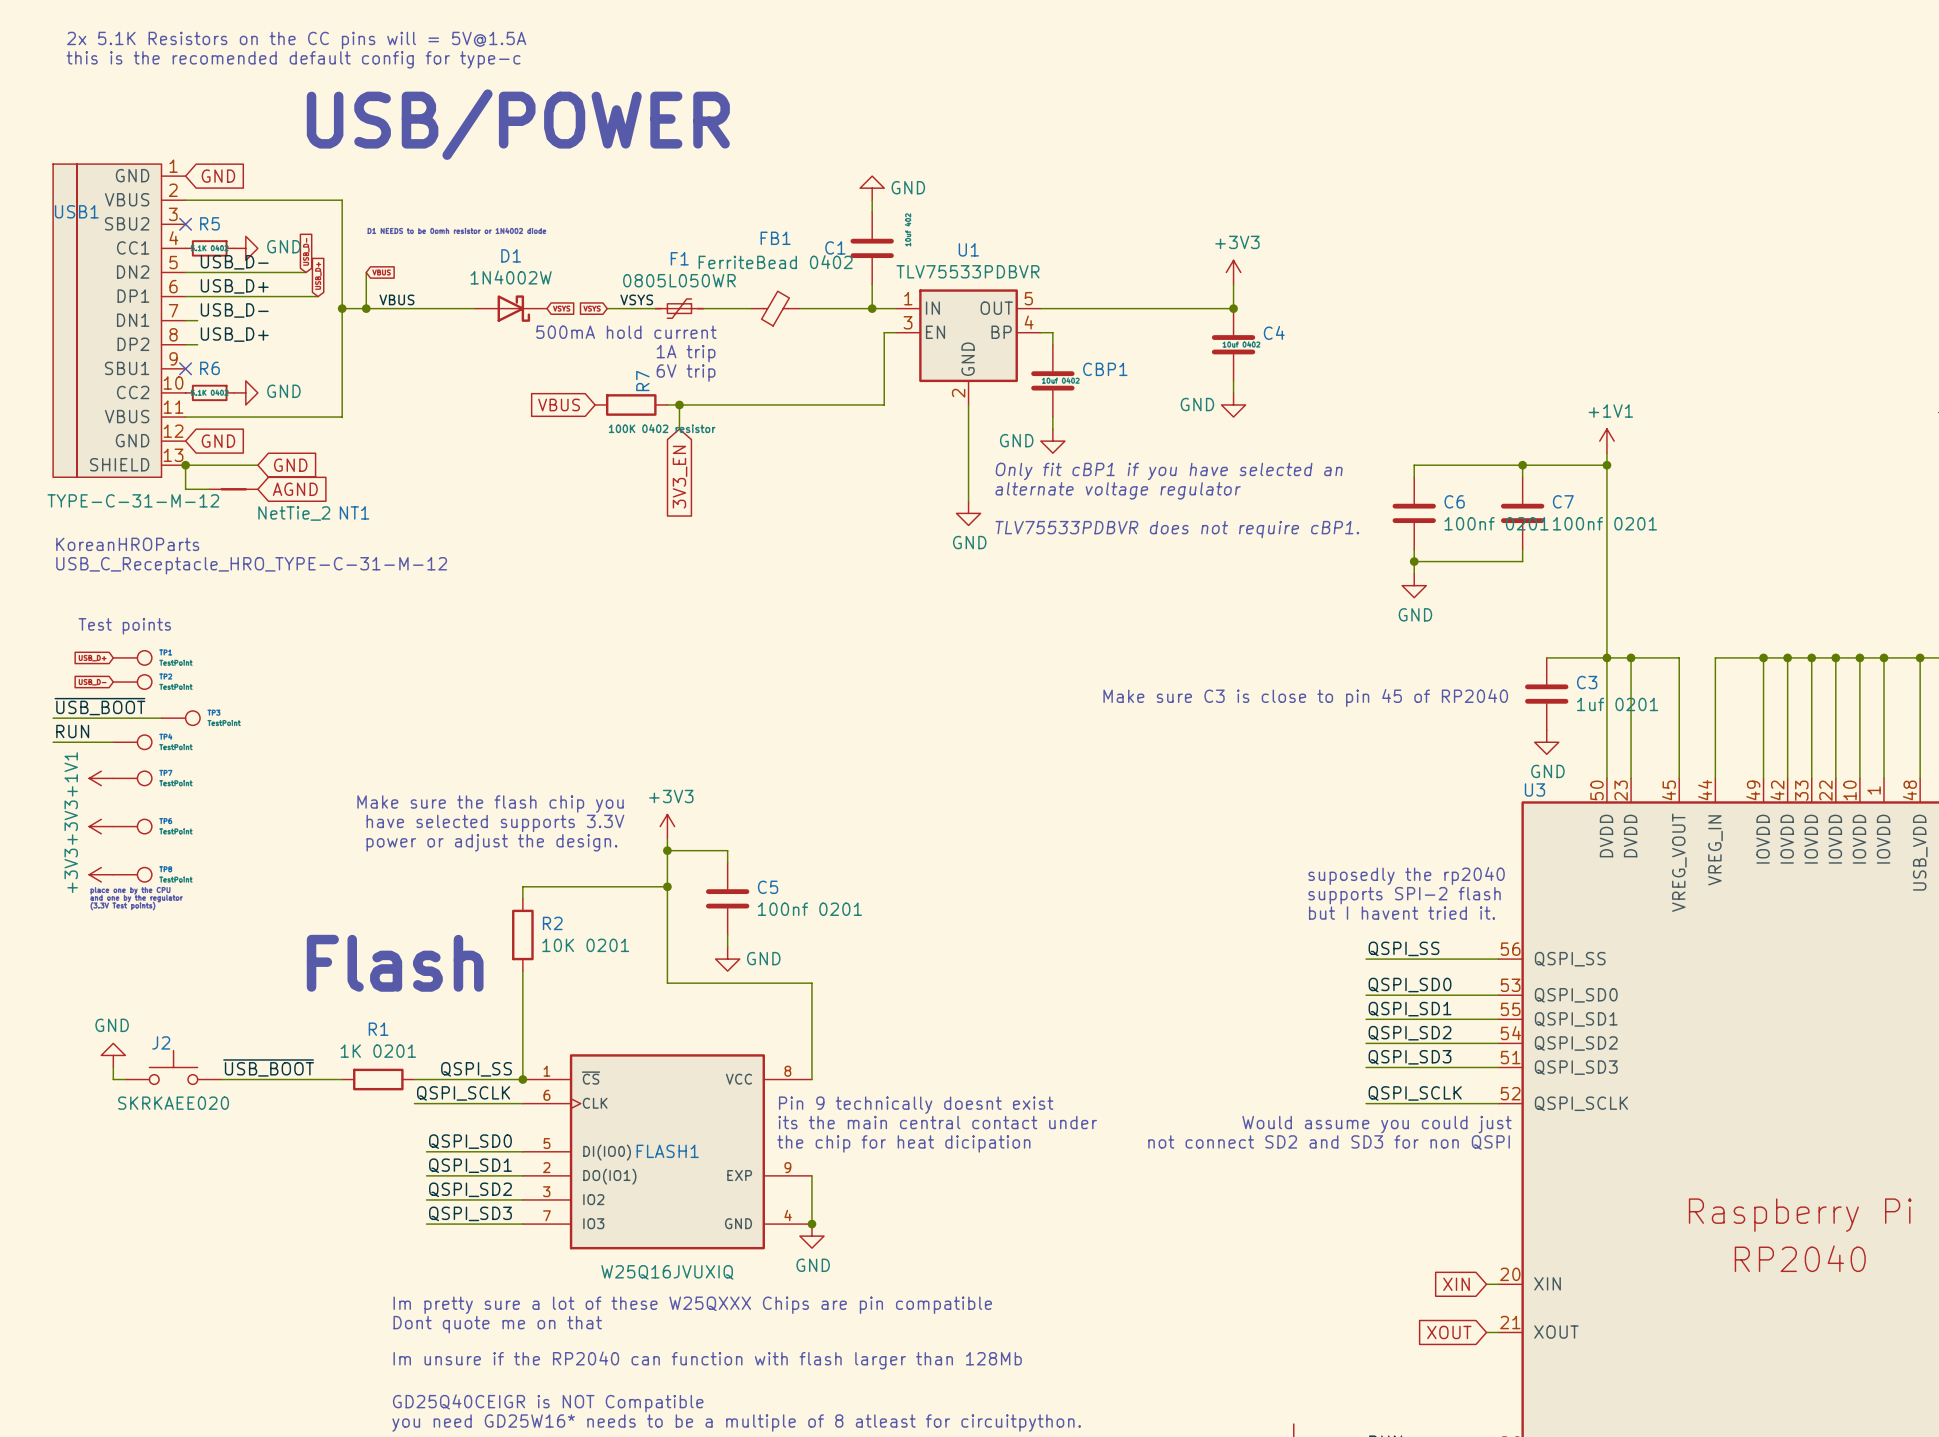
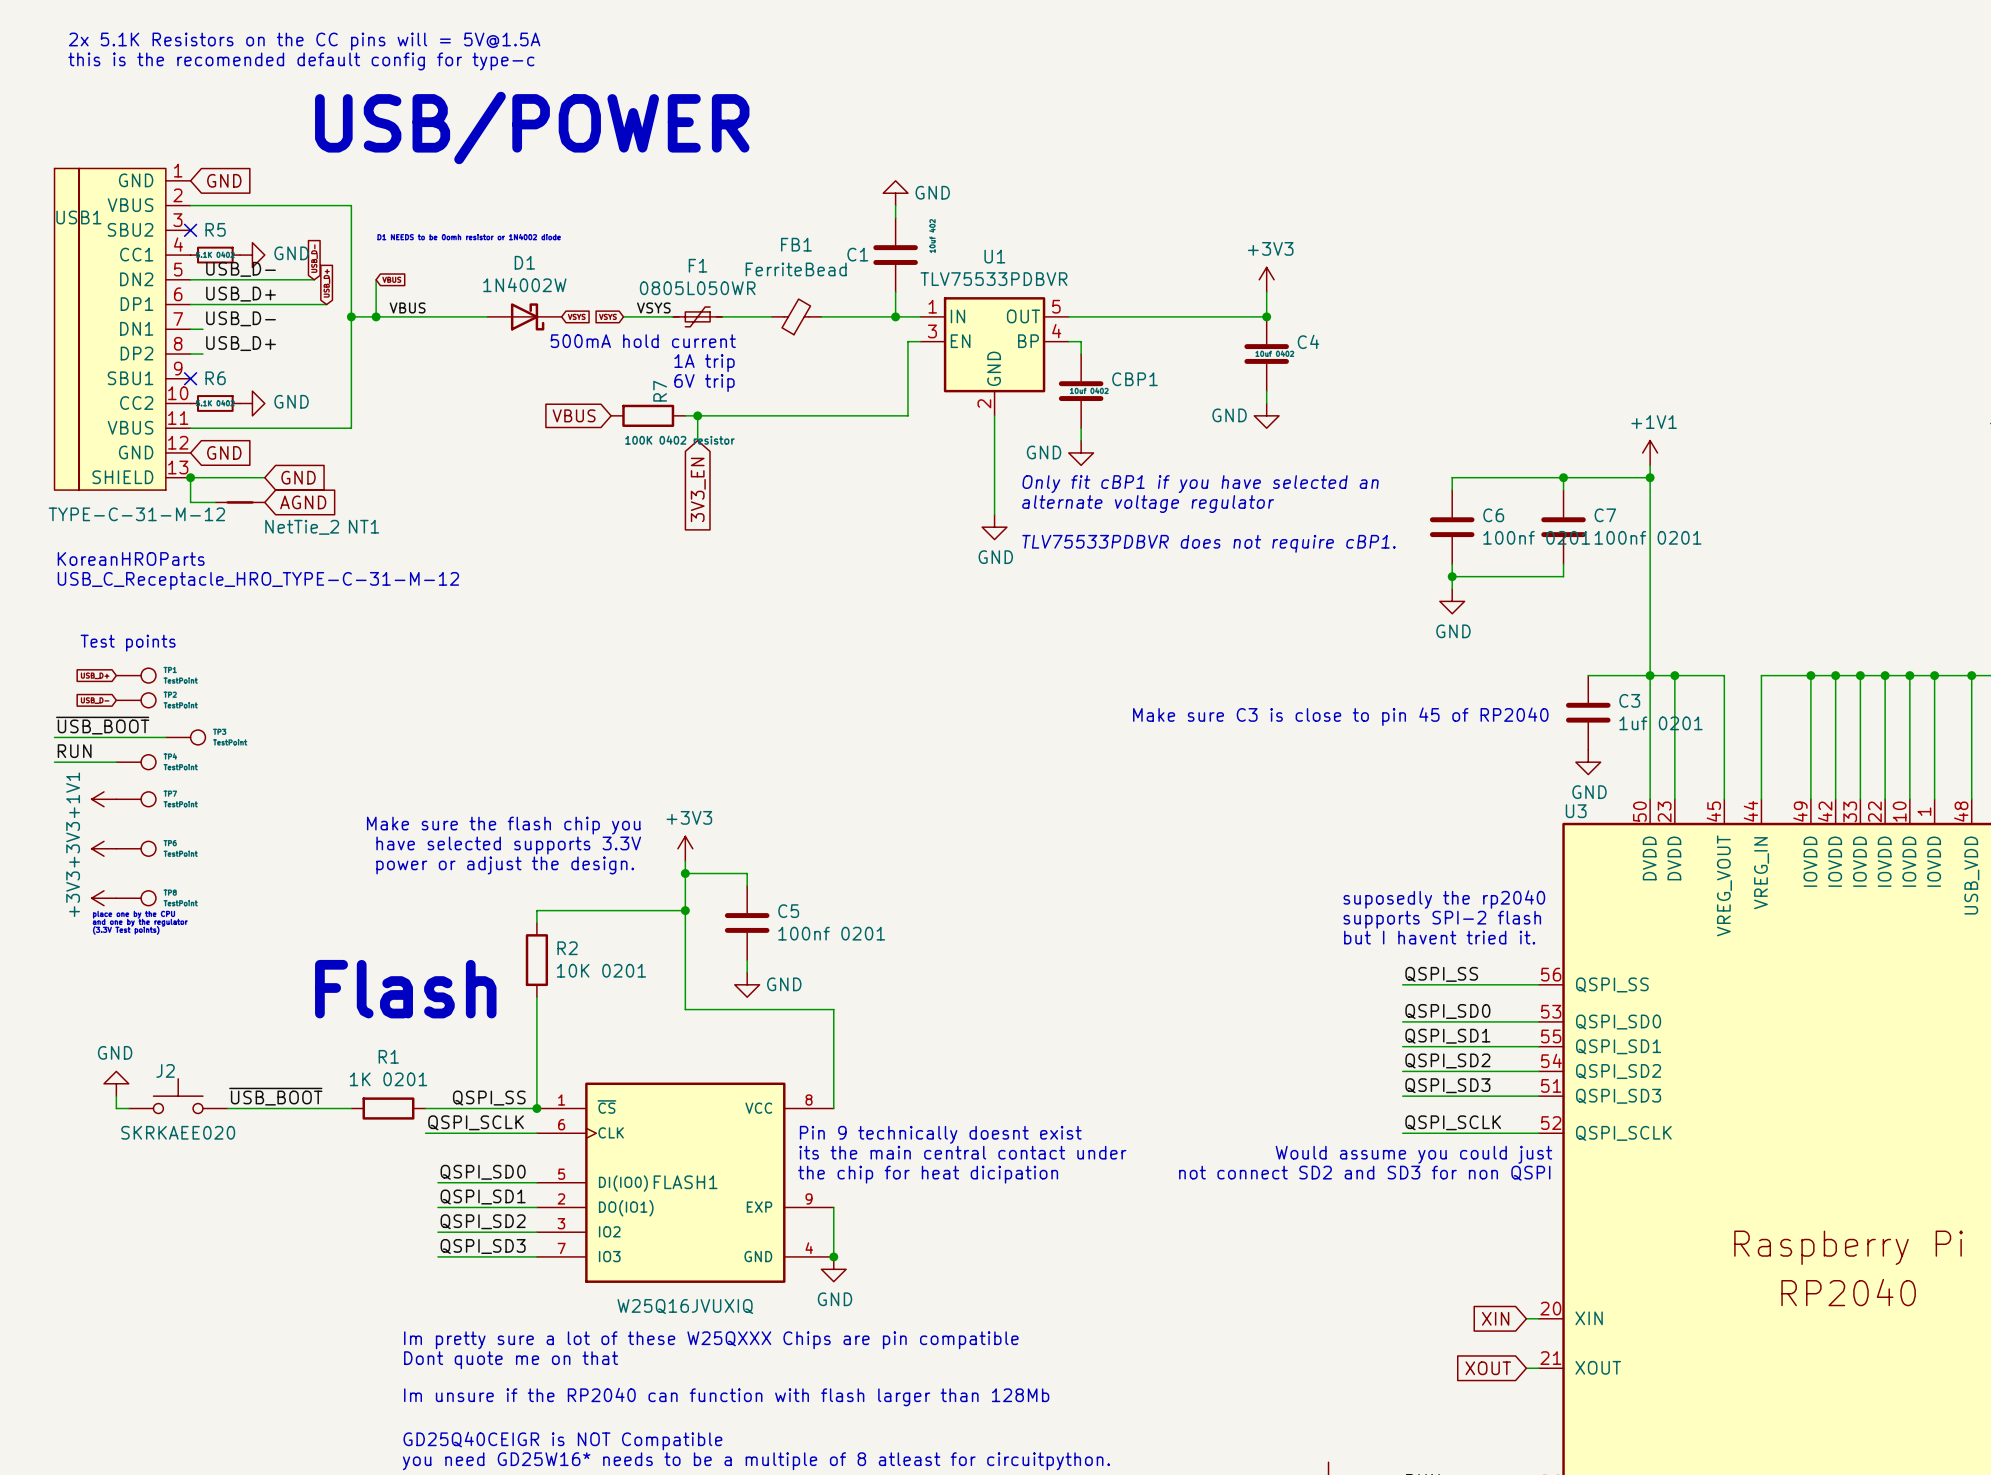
FB1 value: FerriteBead 0402 (775, 262) -> FerriteBead (796, 269)

